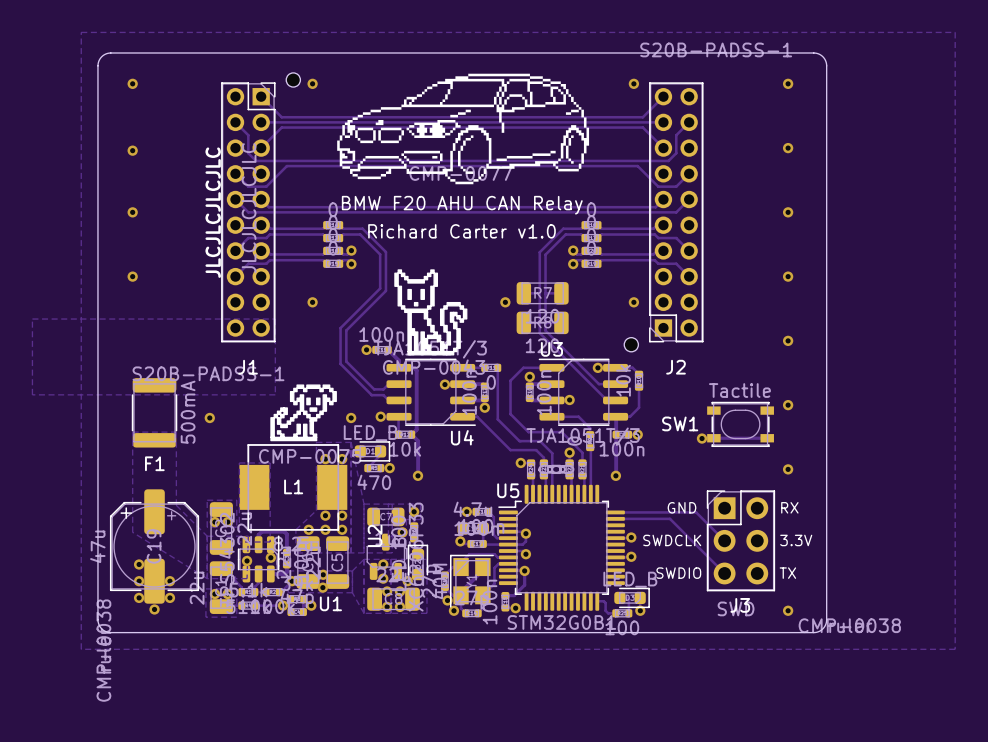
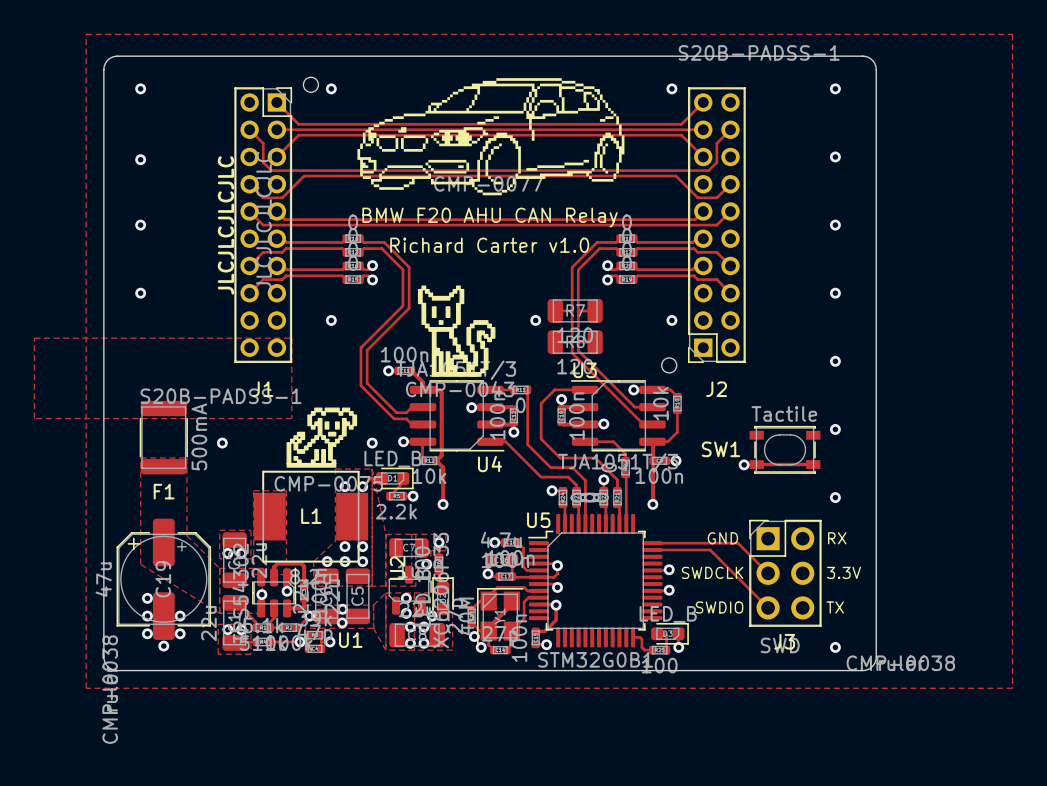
part value: 470 (374, 482) -> 2.2k (396, 511)

